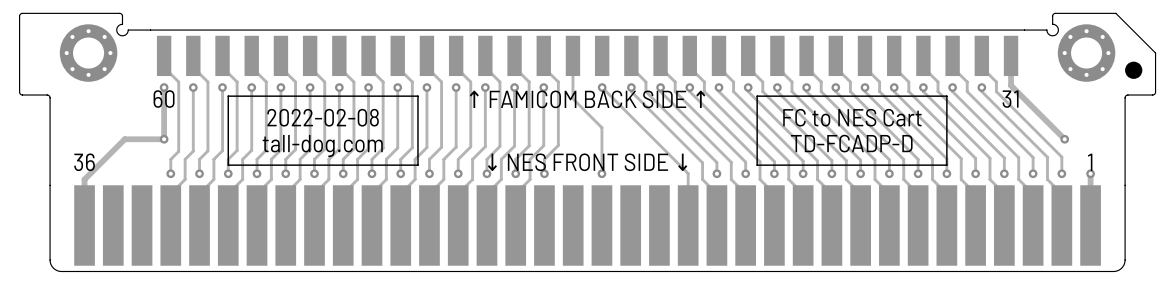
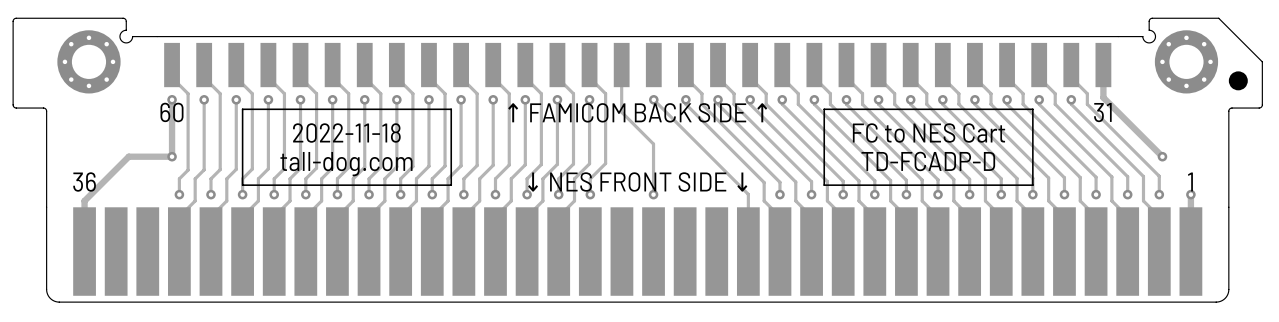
text: 2022-02-08 (323, 117) -> 2022-11-18 (346, 133)

